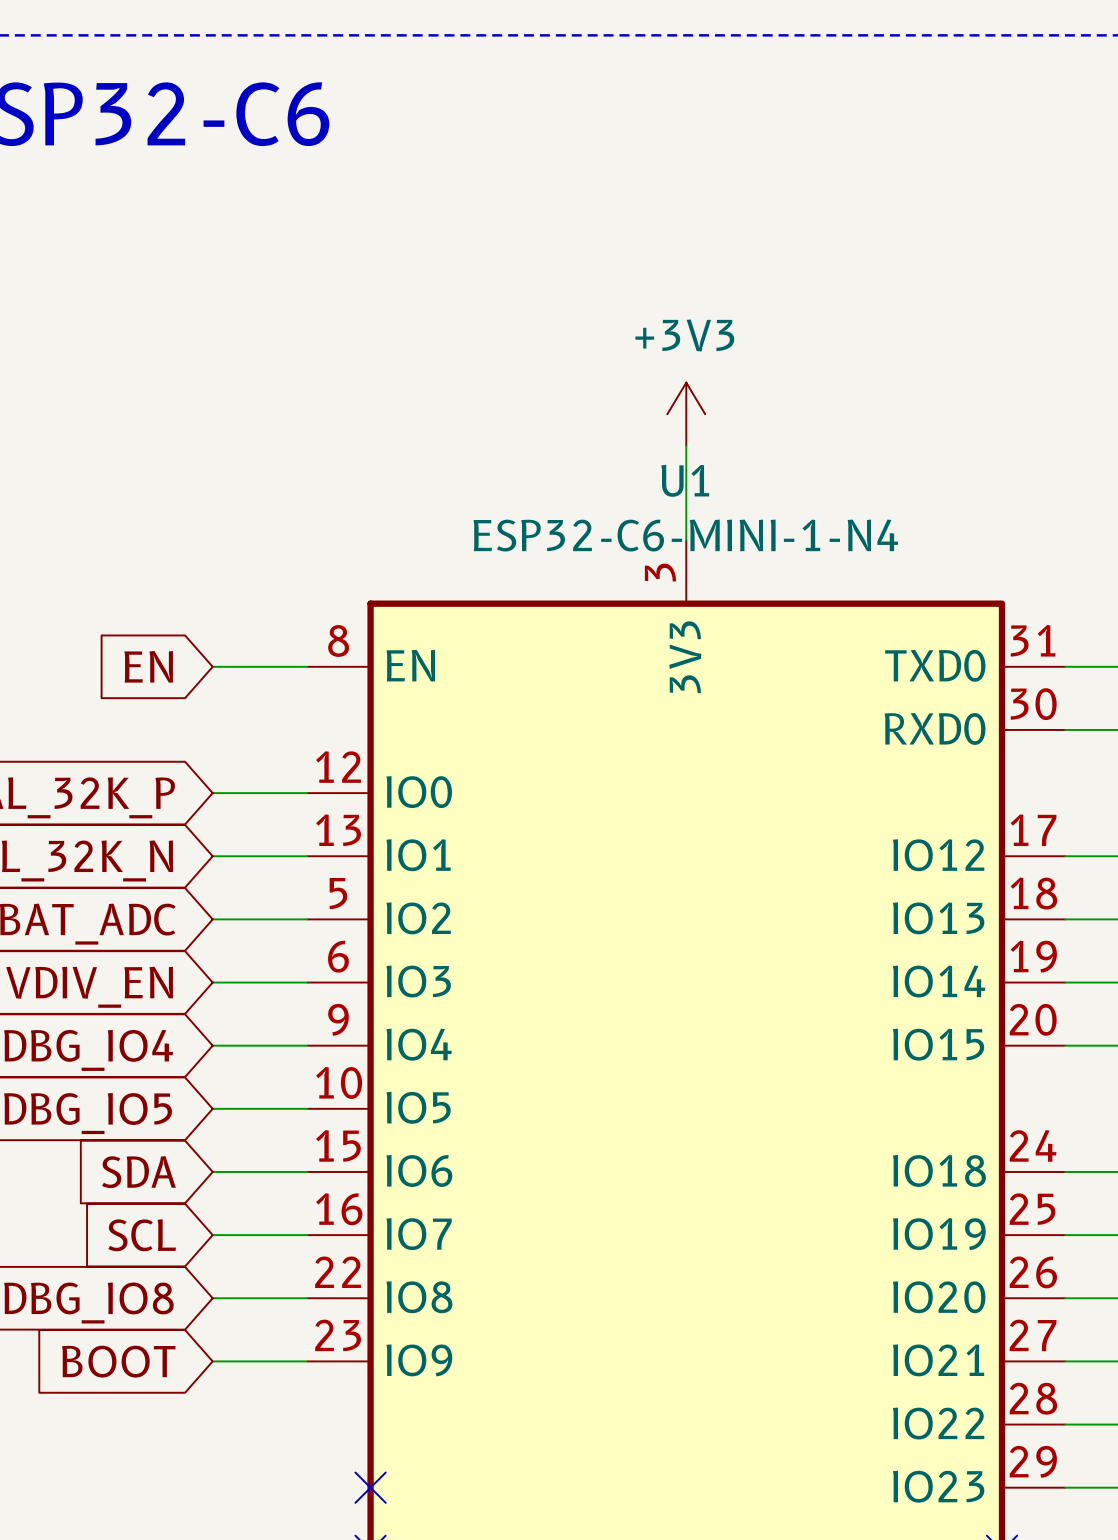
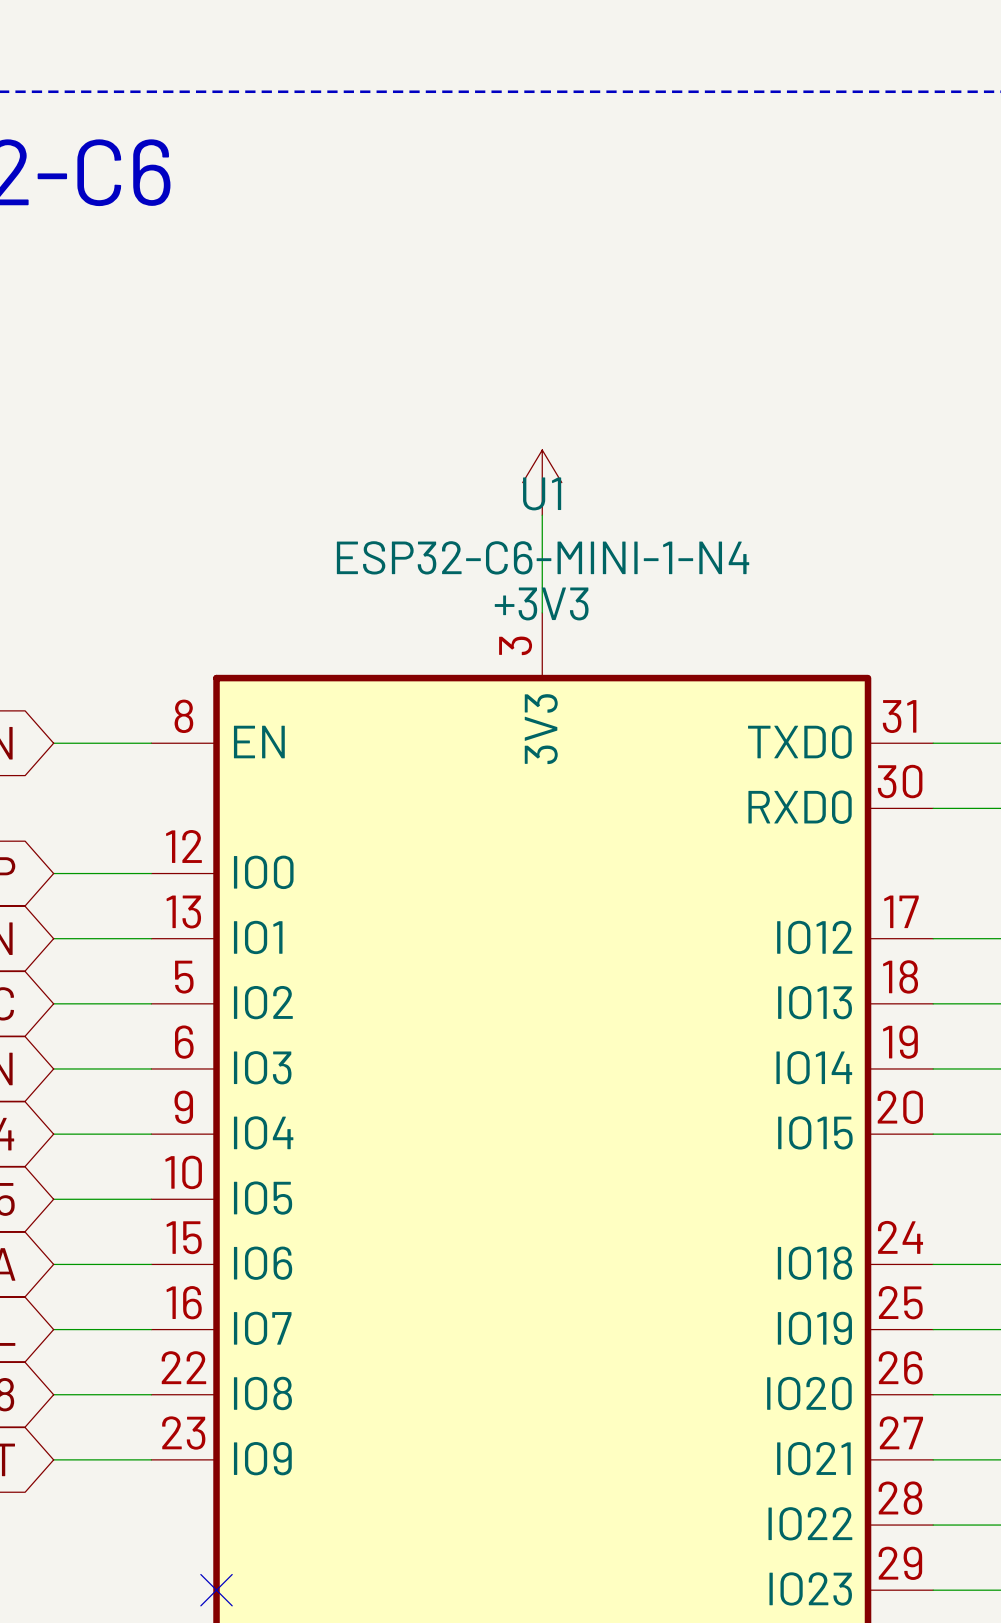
power symbol text position: +3V3 (684, 335) -> +3V3 (541, 603)
U1 name position: U1 (685, 480) -> U1 (542, 493)
U1 value position: ESP32-C6-MINI-1-N4 (685, 535) -> ESP32-C6-MINI-1-N4 (543, 557)

